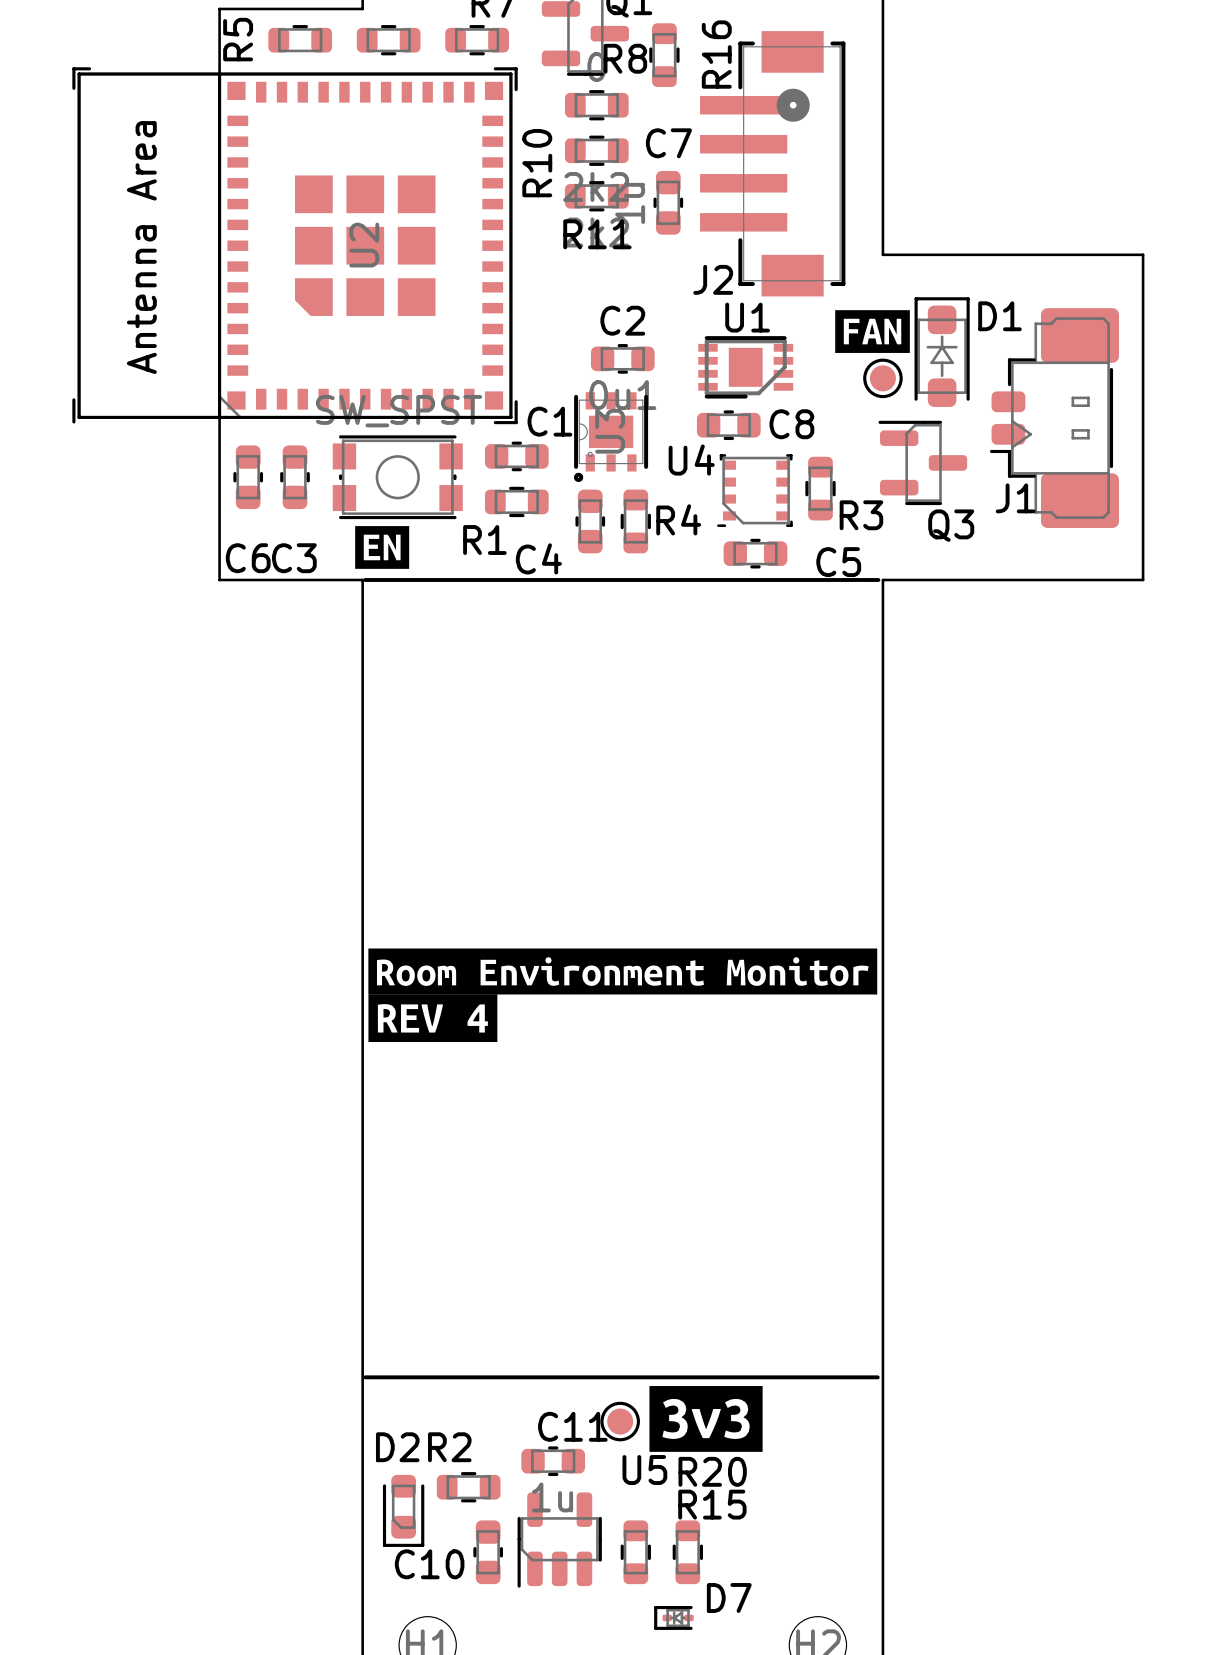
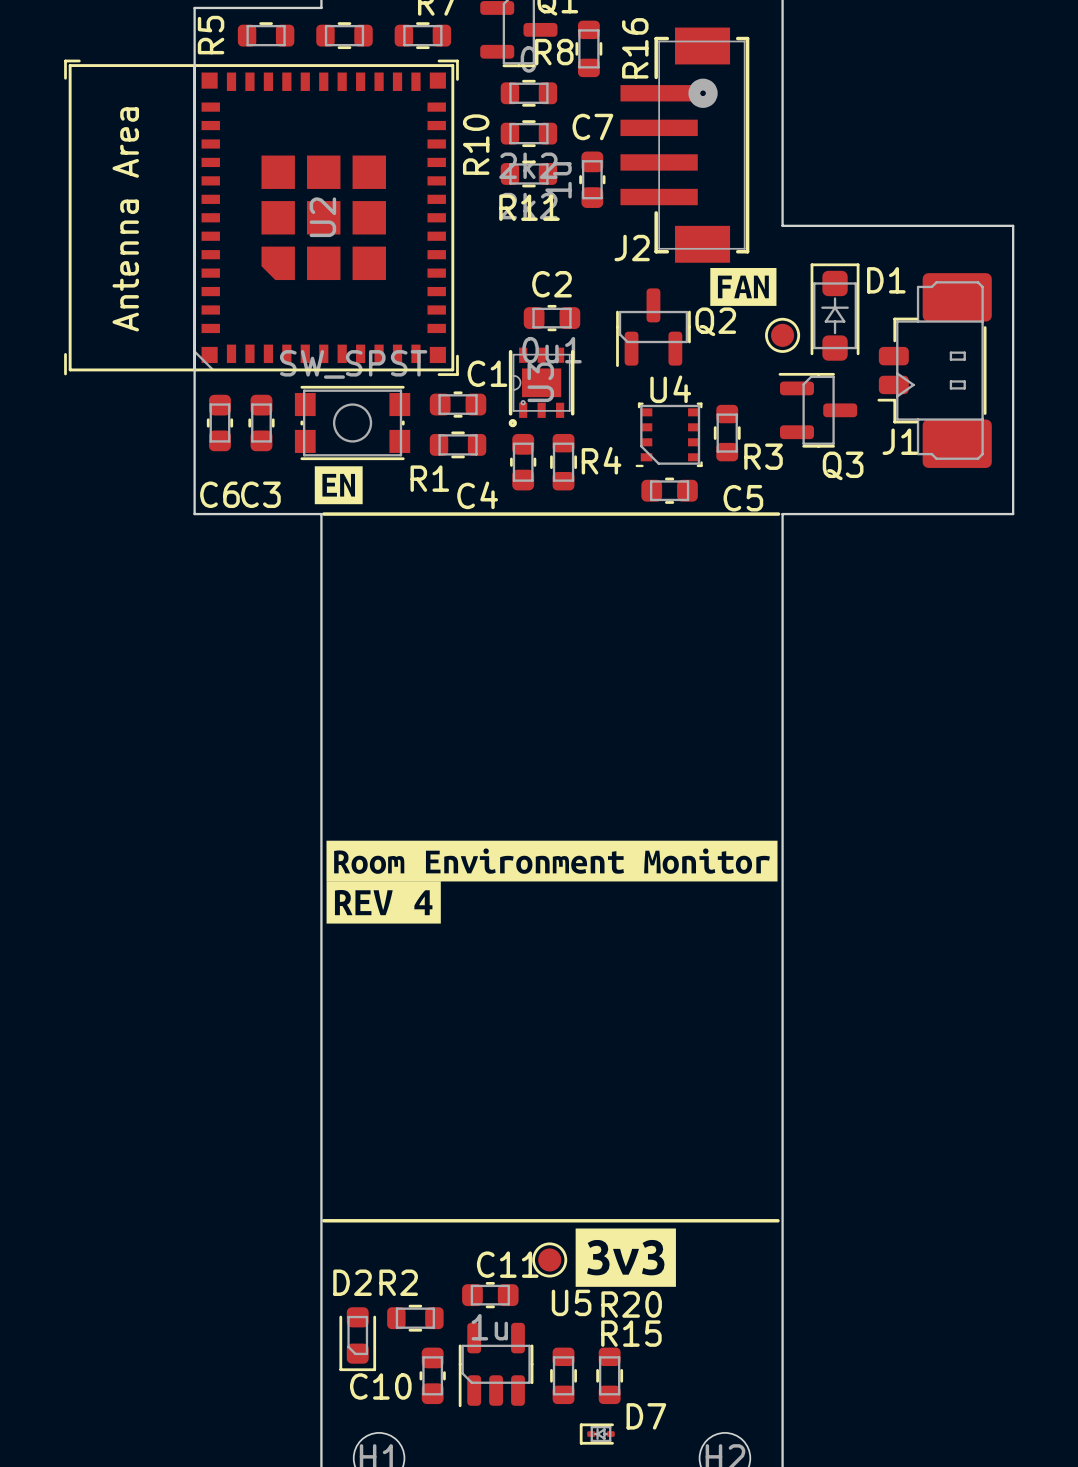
drawing position: (872, 331) -> (743, 286)
U1: (745, 367) -> none
Q2: none -> (653, 327)
C8: (728, 425) -> none
U4 name position: U4 (691, 460) -> U4 (670, 389)

